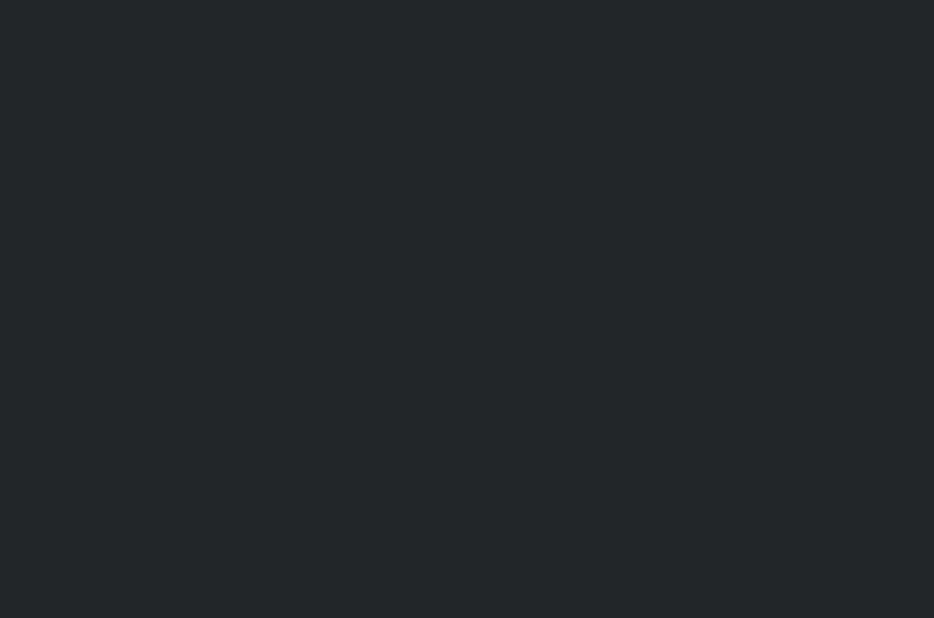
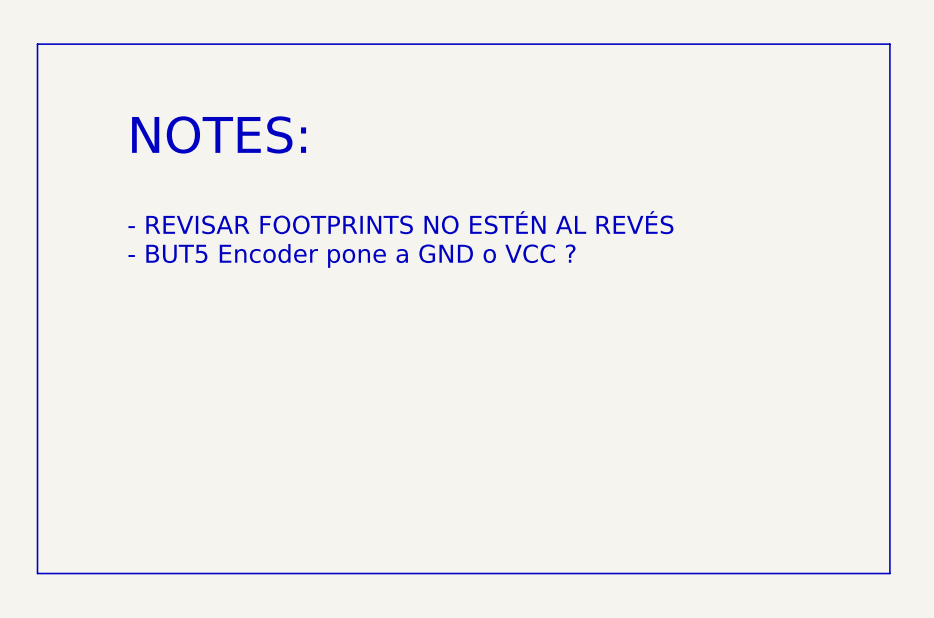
line: none -> (37, 44) (889, 44) (889, 573) (37, 573) (37, 44)
text: none -> NOTES: (219, 134)
text: none -> - REVISAR FOOTPRINTS NO ESTÉN AL REVÉS (400, 222)
text: none -> - BUT5 Encoder pone a GND o VCC ? (351, 255)

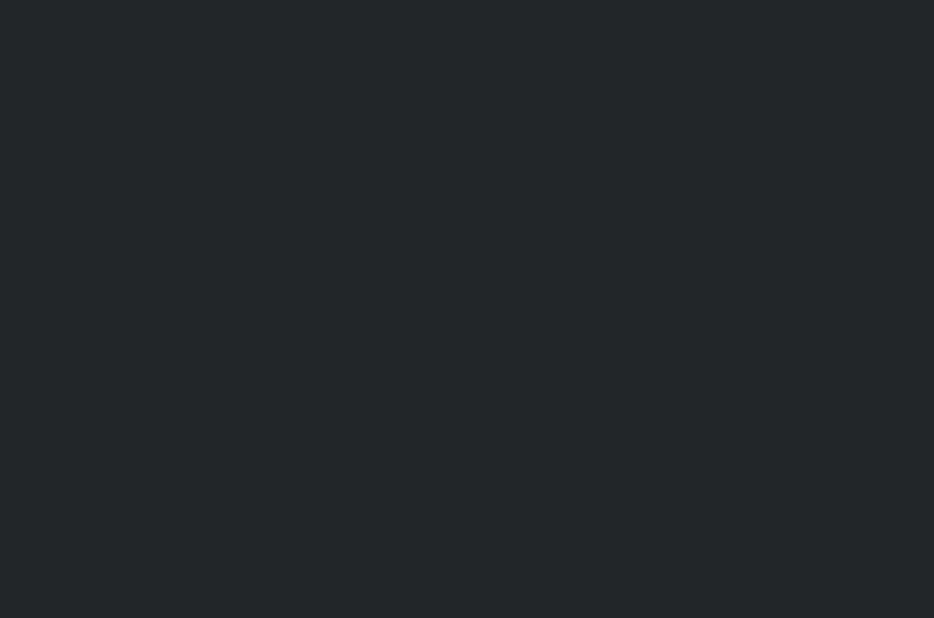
line: (37, 44) (889, 44) (889, 573) (37, 573) (37, 44) -> none
text: NOTES: (219, 134) -> none
text: - REVISAR FOOTPRINTS NO ESTÉN AL REVÉS (400, 222) -> none
text: - BUT5 Encoder pone a GND o VCC ? (351, 255) -> none

